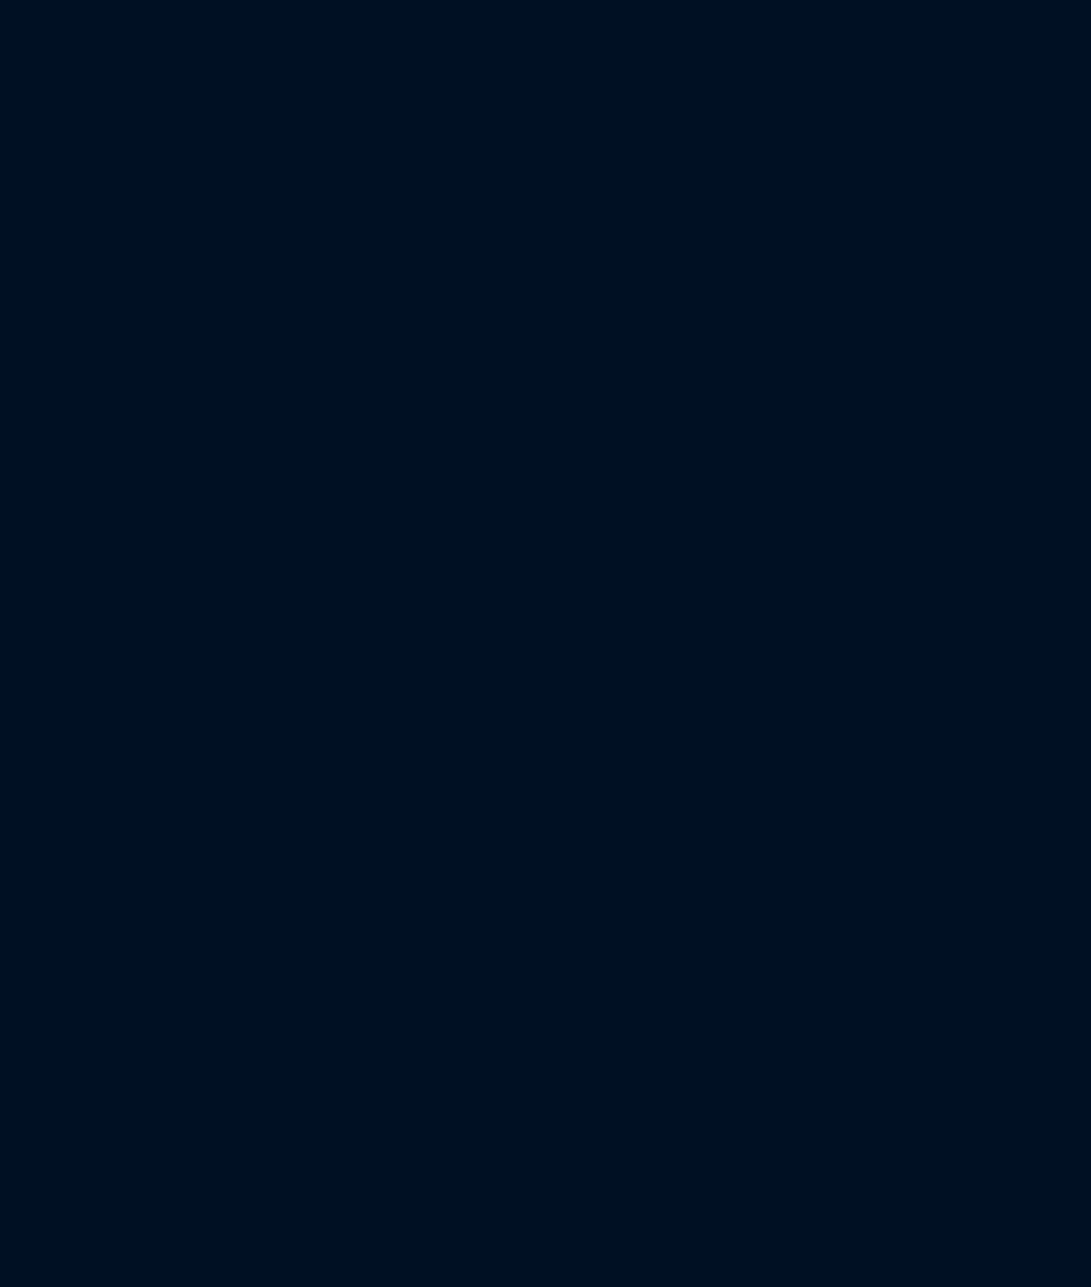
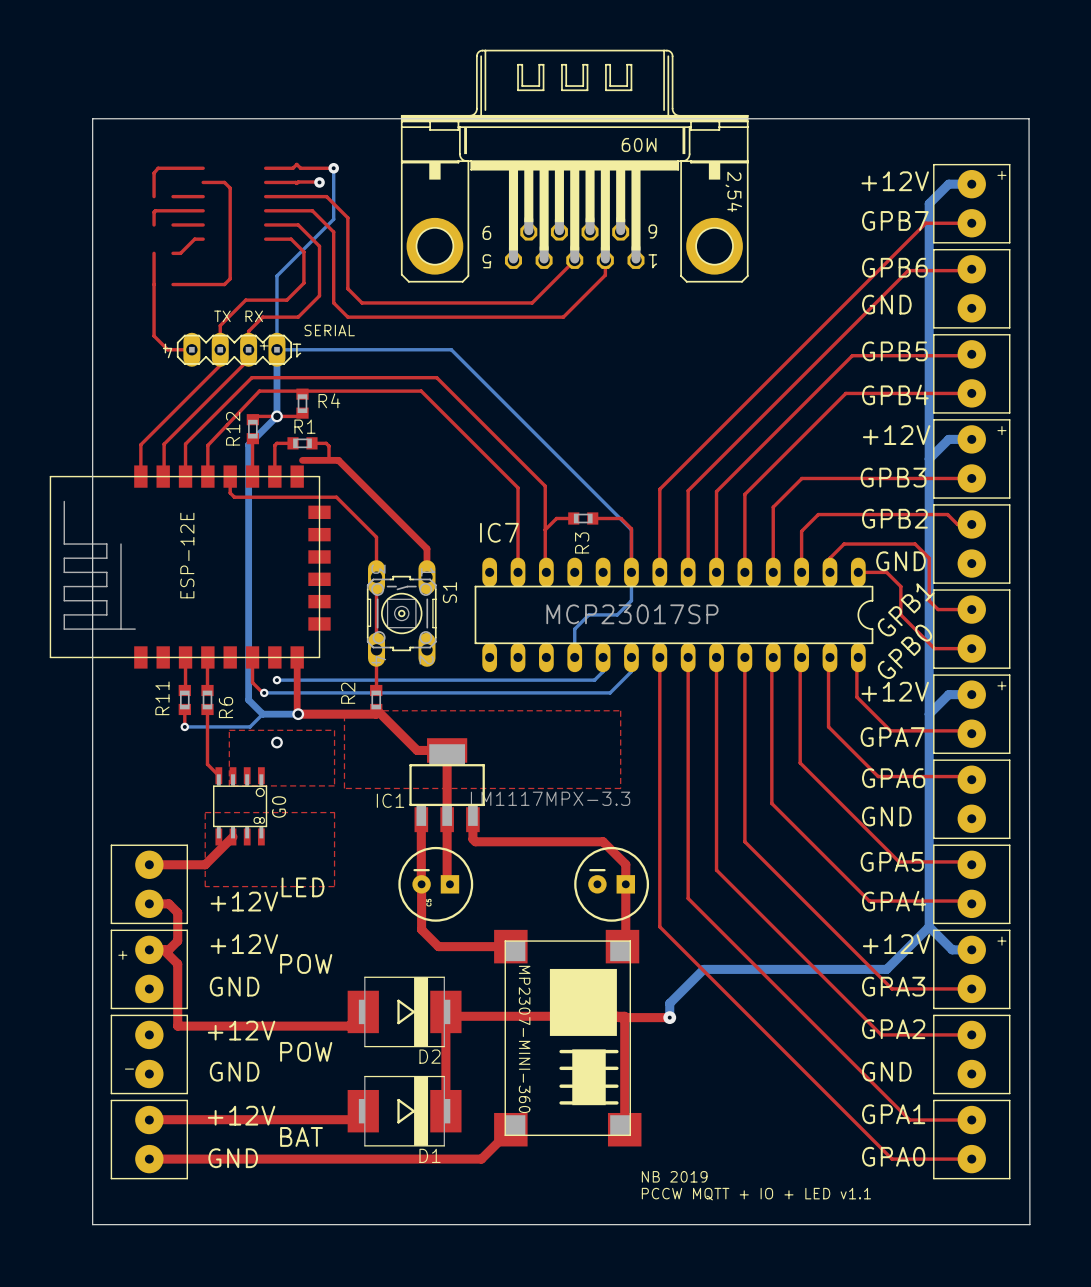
board edge: none -> (92, 118) (92, 1224) (1029, 1224) (1029, 118) (92, 118)
part: none -> (574, 166)
top track: none -> (203, 168) (158, 168) (154, 173) (154, 196)
top track: none -> (265, 168) (293, 168) (296, 164) (300, 168) (333, 168)
bottom track: none -> (333, 168) (333, 219) (276, 276) (276, 349)
via: none -> (333, 168)
text: none -> + (1001, 175)
text: none -> +12V (895, 181)
top track: none -> (203, 182) (224, 182) (230, 188) (230, 278) (224, 284) (173, 284)
top track: none -> (265, 182) (319, 182)
via: none -> (319, 182)
bottom track: none -> (971, 184) (948, 184) (929, 203) (929, 926)
top track: none -> (173, 196) (203, 196)
top track: none -> (265, 196) (326, 196) (347, 217) (347, 288) (362, 302) (532, 302) (574, 260)
part: none -> (971, 203)
top track: none -> (203, 210) (155, 210) (154, 224)
top track: none -> (265, 210) (312, 210) (333, 232) (333, 302) (347, 317) (563, 317) (605, 275) (605, 260)
text: none -> GPB7 (895, 220)
top track: none -> (971, 223) (925, 223) (659, 489) (659, 572)
top track: none -> (173, 224) (203, 224)
top track: none -> (265, 224) (298, 224) (319, 246) (319, 295) (298, 317) (262, 317) (248, 331) (248, 359) (164, 444) (163, 476)
top track: none -> (203, 239) (194, 239) (180, 253) (173, 253)
top track: none -> (265, 239) (291, 239) (303, 251) (303, 283) (286, 300) (245, 300) (220, 325) (220, 365) (140, 444) (140, 476)
top track: none -> (154, 253) (154, 336) (167, 349) (191, 349)
text: none -> GPB6 (894, 267)
top track: none -> (971, 269) (908, 270) (688, 490) (688, 572)
part: none -> (971, 288)
text: none -> GND (886, 304)
text: none -> TX (222, 316)
text: none -> RX (254, 316)
text: none -> SERIAL (329, 330)
text: none -> + (264, 345)
part: none -> (234, 349)
bottom track: none -> (276, 349) (451, 349) (631, 529) (631, 600) (617, 614) (588, 614) (574, 629) (574, 657)
bottom track: none -> (276, 349) (276, 416) (248, 444) (248, 699) (262, 714)
text: none -> GPB5 (894, 351)
top track: none -> (971, 354) (852, 355) (716, 491) (716, 572)
part: none -> (971, 373)
top track: none -> (971, 393) (845, 393) (744, 494) (744, 572)
text: none -> GPB4 (895, 394)
R4: none -> (302, 403)
top track: none -> (302, 413) (299, 416) (252, 416) (252, 419)
via: none -> (276, 416)
R12: none -> (252, 429)
text: none -> + (1001, 430)
text: none -> +12V (896, 435)
top track: none -> (252, 438) (252, 476)
bottom track: none -> (971, 439) (948, 439) (929, 458)
top track: none -> (293, 443) (276, 443) (274, 445) (274, 476)
R1: none -> (302, 443)
top track: none -> (311, 443) (326, 443) (329, 446) (329, 460) (302, 460) (338, 460) (426, 548) (426, 577)
part: none -> (971, 458)
top track: none -> (185, 476) (185, 444) (251, 377) (436, 377) (545, 486) (546, 572)
top track: none -> (207, 476) (207, 445) (259, 391) (421, 391) (518, 487) (518, 572)
top track: none -> (230, 476) (230, 492) (234, 497) (336, 497) (376, 537) (376, 690)
text: none -> GPB3 (893, 477)
top track: none -> (971, 478) (801, 478) (773, 507) (773, 572)
top track: none -> (573, 518) (556, 518) (545, 529)
R3: none -> (583, 518)
top track: none -> (592, 518) (621, 518) (631, 528) (631, 572)
text: none -> GPB2 (894, 518)
top track: none -> (971, 524) (957, 524) (947, 514) (818, 514) (801, 531) (801, 572)
part: none -> (971, 544)
text: none -> GND (901, 561)
part: none -> (190, 567)
top track: none -> (829, 572) (829, 558) (844, 544) (915, 544) (929, 558) (929, 600) (938, 609) (971, 609)
top track: none -> (858, 572) (886, 572) (900, 586) (900, 614) (934, 648) (971, 648)
text: none -> GPB1 (906, 609)
S1: none -> (401, 613)
IC7: none -> MCP23017SP (673, 614)
part: none -> (971, 629)
text: none -> GPB0 (905, 651)
top track: none -> (185, 657) (184, 690)
top track: none -> (207, 657) (207, 690)
top track: none -> (252, 657) (252, 682) (264, 692)
top track: none -> (297, 657) (298, 714) (376, 714) (376, 709) (417, 750) (447, 750) (447, 881) (449, 884)
bottom track: none -> (603, 657) (603, 671) (594, 680) (276, 680)
bottom track: none -> (631, 657) (631, 671) (610, 692) (264, 692)
top track: none -> (659, 657) (659, 926) (892, 1159) (971, 1159)
top track: none -> (688, 657) (688, 898) (909, 1120) (971, 1120)
top track: none -> (716, 657) (716, 870) (881, 1034) (971, 1034)
top track: none -> (744, 657) (744, 841) (892, 988) (971, 988)
top track: none -> (773, 657) (771, 803) (869, 901) (968, 901) (971, 903)
top track: none -> (801, 657) (800, 762) (899, 861) (968, 861) (971, 864)
top track: none -> (829, 657) (828, 726) (878, 776) (966, 776) (971, 779)
top track: none -> (858, 657) (856, 697) (890, 730) (968, 730) (971, 733)
via: none -> (276, 680)
text: none -> + (1001, 685)
text: none -> +12V (895, 691)
via: none -> (264, 692)
bottom track: none -> (971, 694) (948, 694) (929, 714)
R11: none -> (184, 699)
R6: none -> (207, 699)
R2: none -> (376, 699)
top track: none -> (184, 709) (184, 726)
top track: none -> (207, 709) (207, 764) (218, 775)
top zone outline: none -> (344, 710) (344, 788) (620, 788) (620, 710) (344, 710)
bottom track: none -> (262, 714) (250, 726) (184, 726)
bottom track: none -> (262, 714) (298, 714)
via: none -> (298, 714)
part: none -> (971, 714)
via: none -> (184, 726)
top zone outline: none -> (229, 730) (229, 785) (334, 785) (334, 730) (229, 730)
text: none -> GPA7 (892, 737)
via: none -> (276, 742)
text: none -> GPA6 (893, 778)
IC1: none -> LM1117MPX-3.3 (447, 785)
part: none -> (971, 799)
G0: none -> (240, 806)
top zone outline: none -> (205, 812) (205, 886) (334, 886) (334, 812) (205, 812)
text: none -> GND (886, 816)
top track: none -> (421, 819) (421, 929) (438, 946) (510, 946)
top track: none -> (472, 819) (472, 839) (475, 841) (603, 841) (625, 864) (625, 943) (622, 946)
top track: none -> (233, 836) (205, 864) (149, 864)
text: none -> GPA5 (892, 861)
part: none -> (149, 884)
part: none -> (435, 884)
part: none -> (611, 884)
part: none -> (971, 884)
text: none -> LED (302, 887)
text: none -> +12V (244, 901)
text: none -> GPA4 (894, 901)
top track: none -> (149, 903) (168, 903) (177, 912) (177, 941) (168, 949) (149, 949)
bottom track: none -> (929, 926) (952, 949) (971, 949)
bottom track: none -> (929, 926) (886, 969) (703, 969) (669, 1003) (669, 1017)
text: none -> + (1001, 941)
text: none -> +12V (244, 944)
text: none -> +12V (896, 944)
top track: none -> (163, 949) (177, 964) (177, 1026) (349, 1026) (363, 1011)
text: none -> + (122, 955)
text: none -> POW (306, 963)
part: none -> (149, 969)
part: none -> (971, 969)
text: none -> GND (234, 986)
text: none -> GPA3 (893, 986)
D2: none -> (404, 1011)
top track: none -> (617, 1016) (669, 1017)
via: none -> (669, 1017)
text: none -> GPA2 (893, 1029)
text: none -> +12V (241, 1030)
part: none -> (567, 1038)
text: none -> POW (306, 1051)
part: none -> (149, 1054)
part: none -> (971, 1054)
text: none -> - (129, 1069)
text: none -> GND (234, 1071)
text: none -> GND (886, 1071)
top track: none -> (363, 1111) (354, 1119) (149, 1120)
D1: none -> (404, 1111)
top track: none -> (445, 1111) (445, 1011) (450, 1016) (624, 1016) (624, 1129)
text: none -> GPA1 (893, 1114)
text: none -> +12V (241, 1115)
top track: none -> (510, 1129) (481, 1159) (149, 1159)
text: none -> BAT (301, 1136)
part: none -> (149, 1139)
part: none -> (971, 1139)
text: none -> GPA0 (893, 1156)
text: none -> GND (233, 1158)
text: none -> NB 2019 (674, 1176)
text: none -> PCCW MQTT + IO + LED v1.1 (756, 1194)

